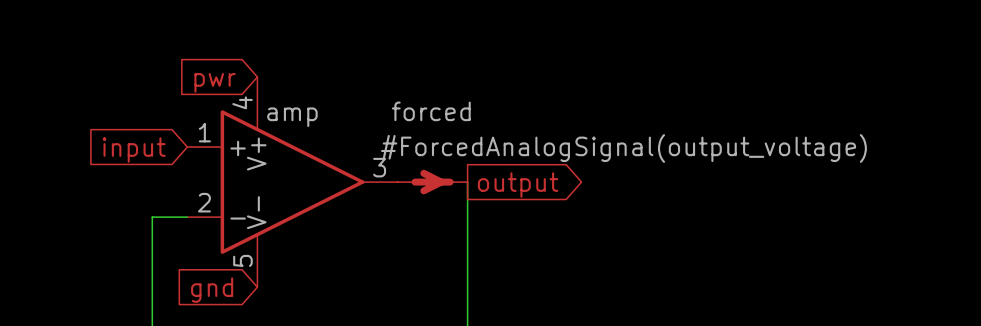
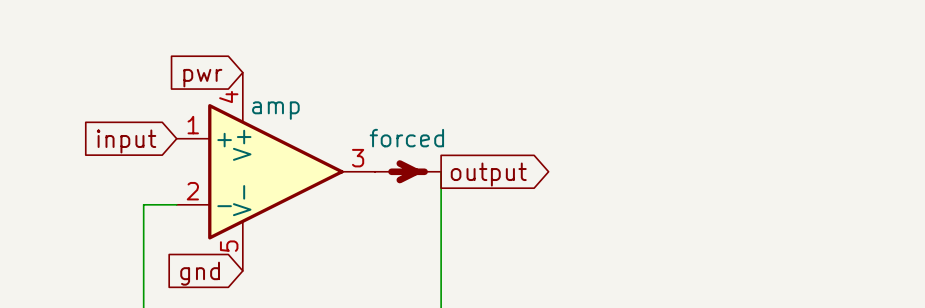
forced name position: forced (431, 111) -> forced (406, 138)
forced value: #ForcedAnalogSignal(output_voltage) (623, 148) -> none

